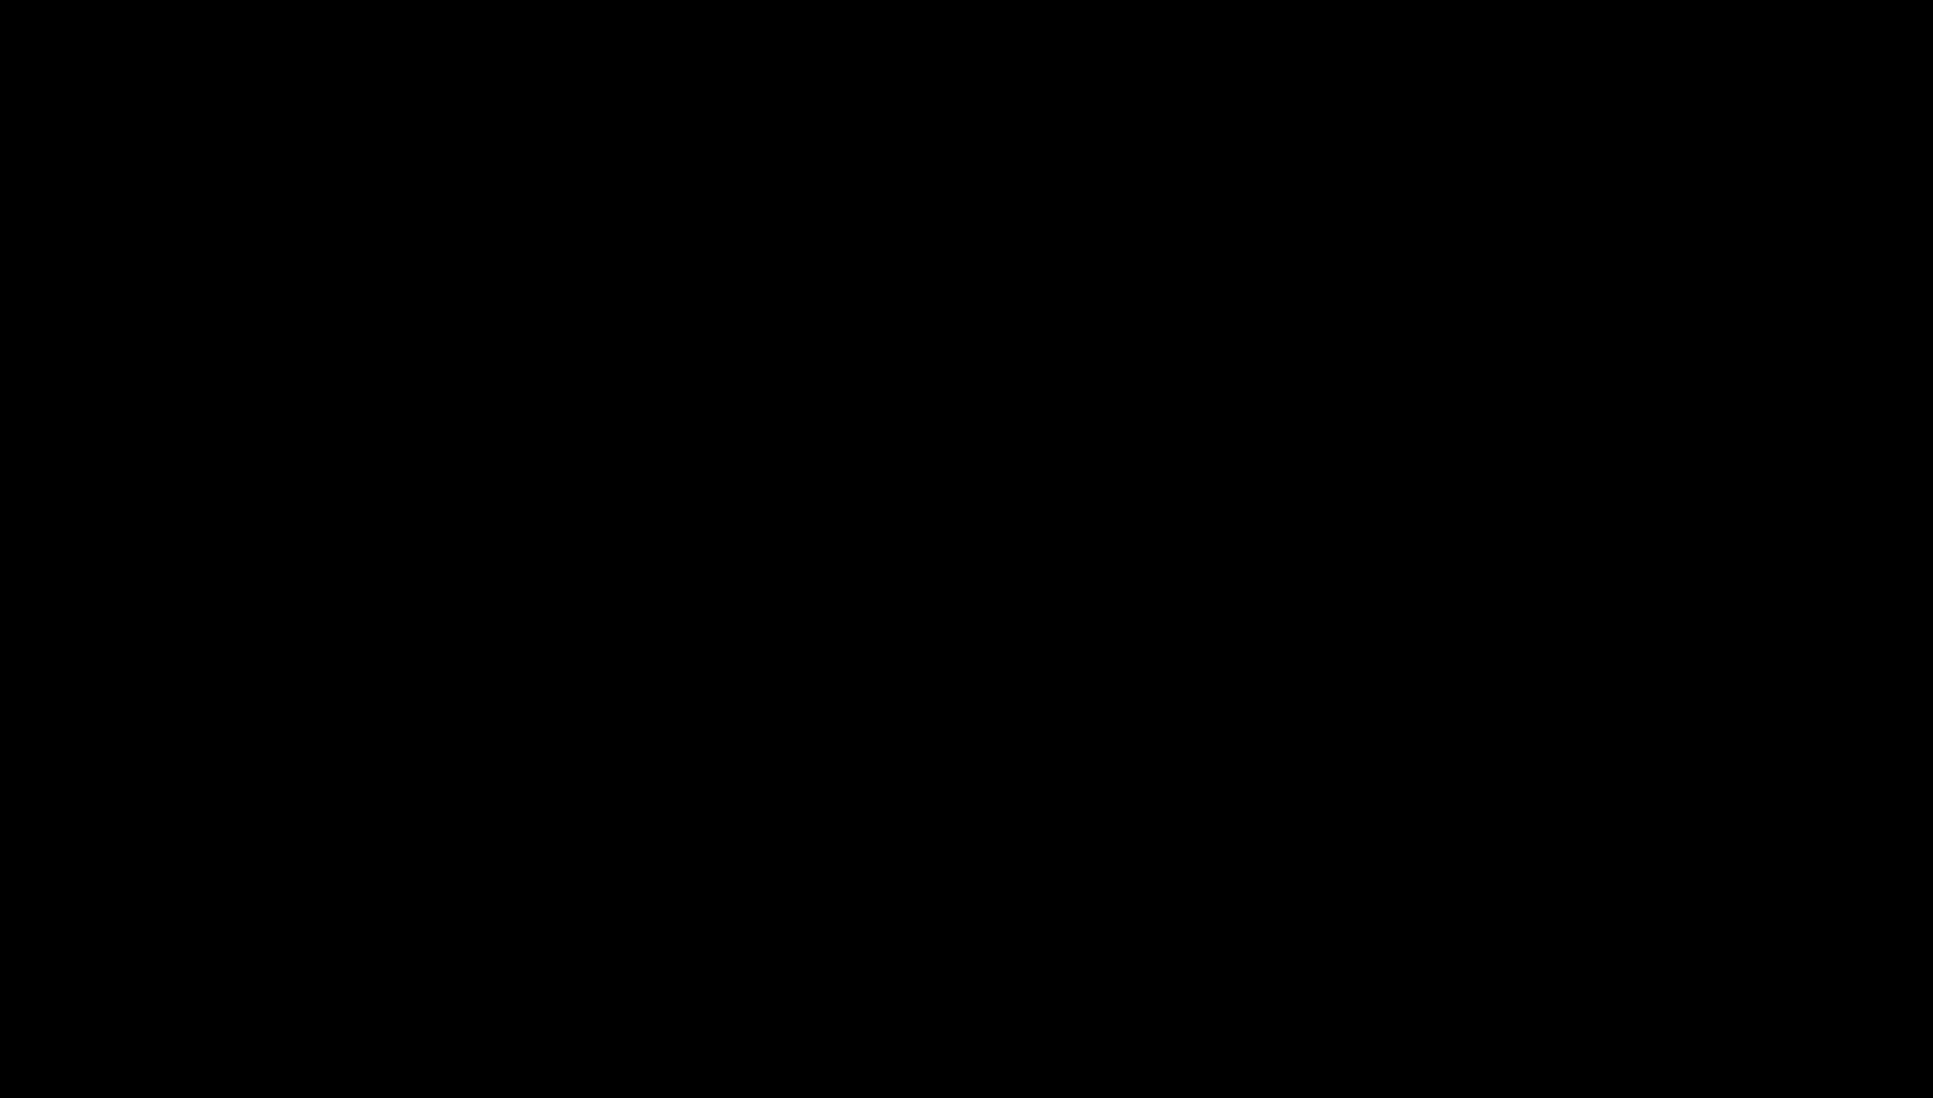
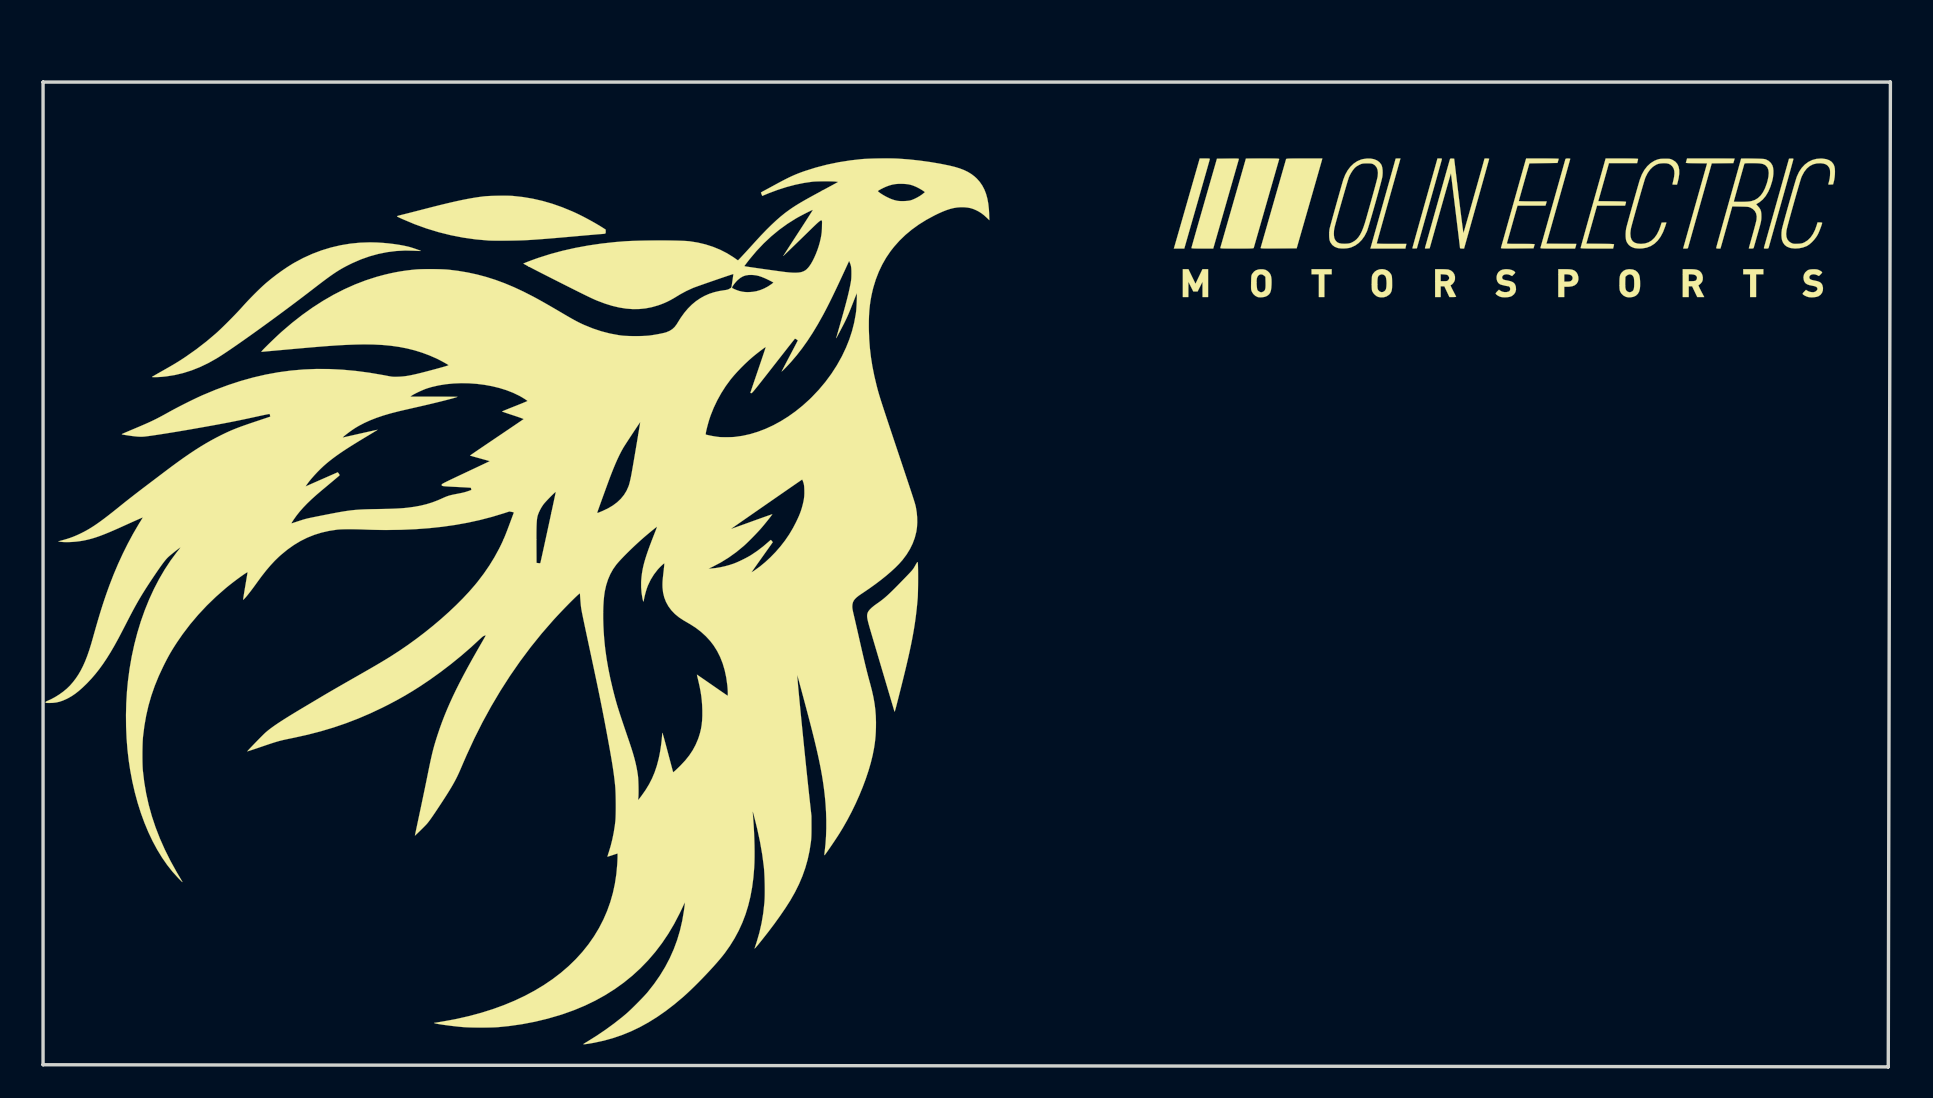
board edge: none -> (1890, 82) (1888, 1066) (43, 1064) (43, 82) (1890, 82)
drawing: none -> [45, 158, 990, 1045]
drawing: none -> [1173, 158, 1836, 298]

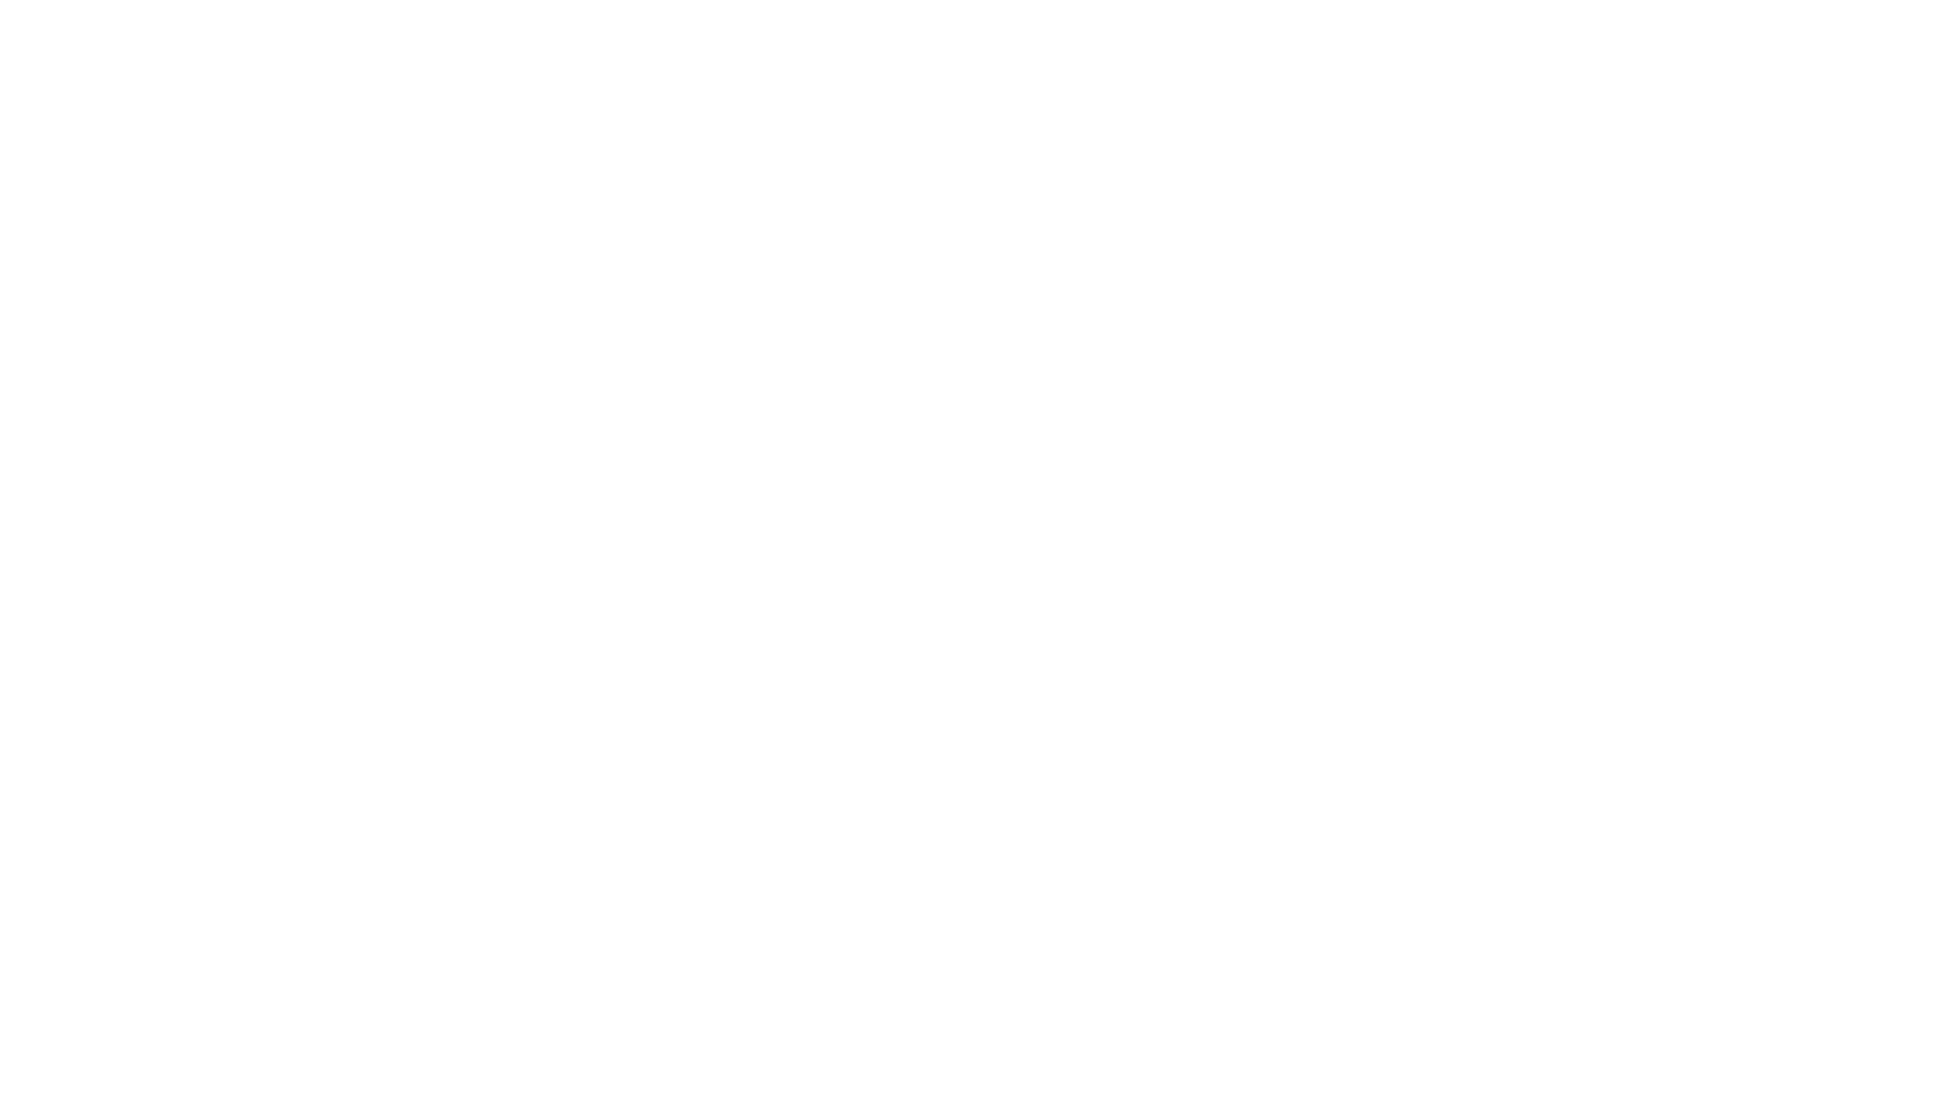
board edge: (1890, 82) (1888, 1066) (43, 1064) (43, 82) (1890, 82) -> none
drawing: [45, 158, 990, 1045] -> none
drawing: [1173, 158, 1836, 298] -> none

